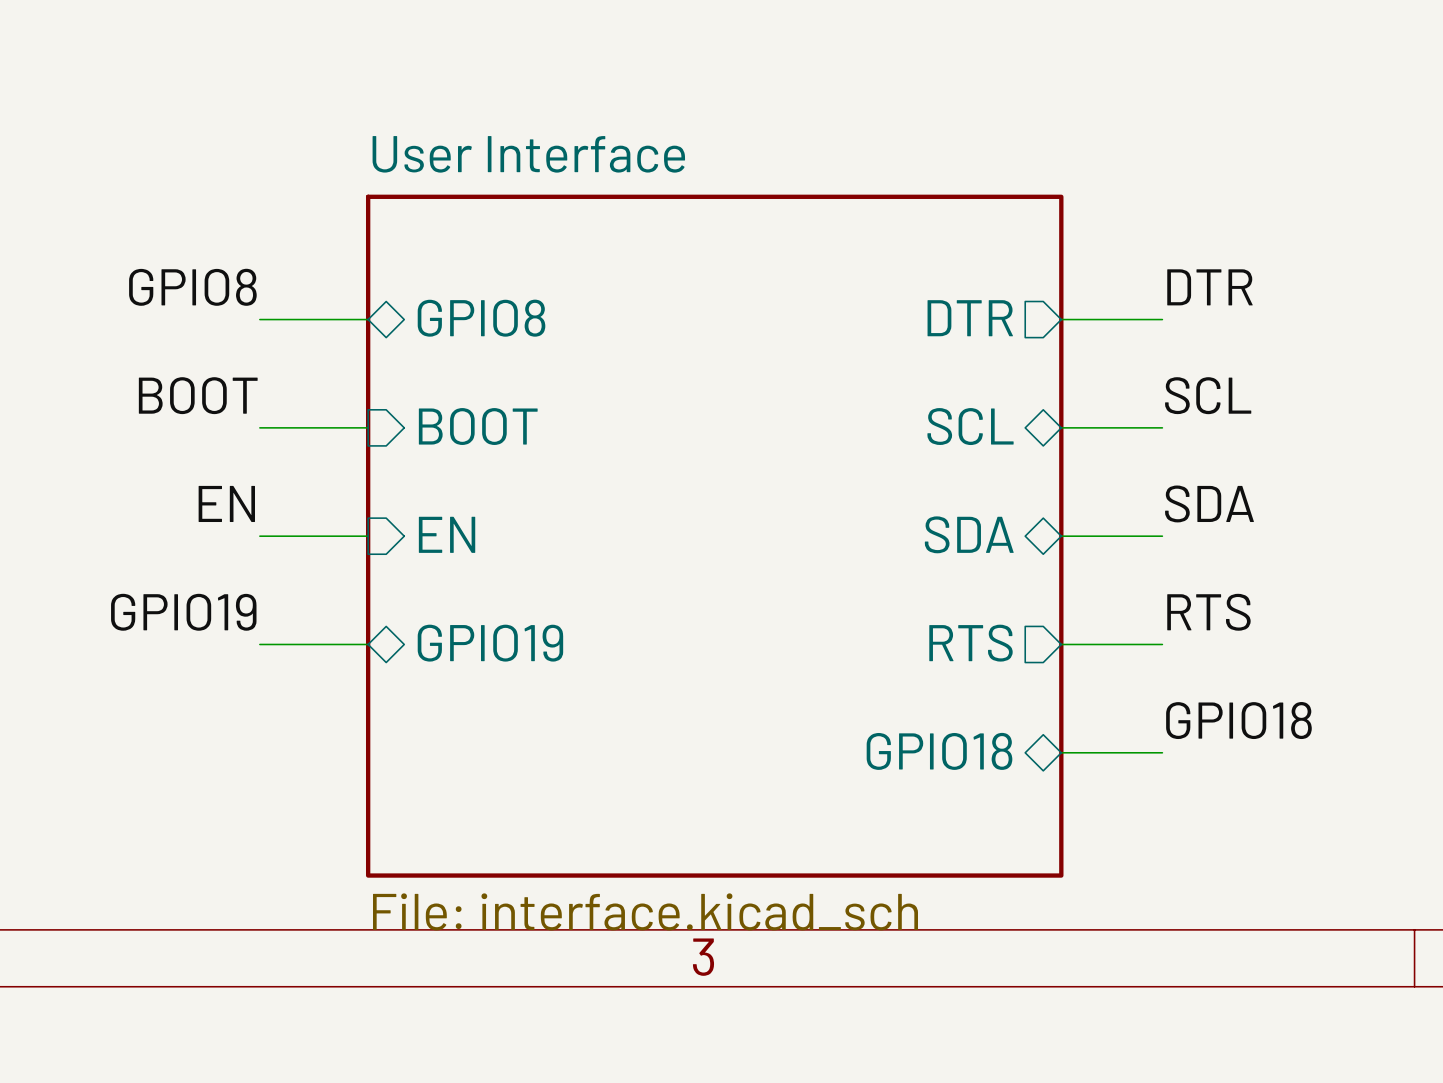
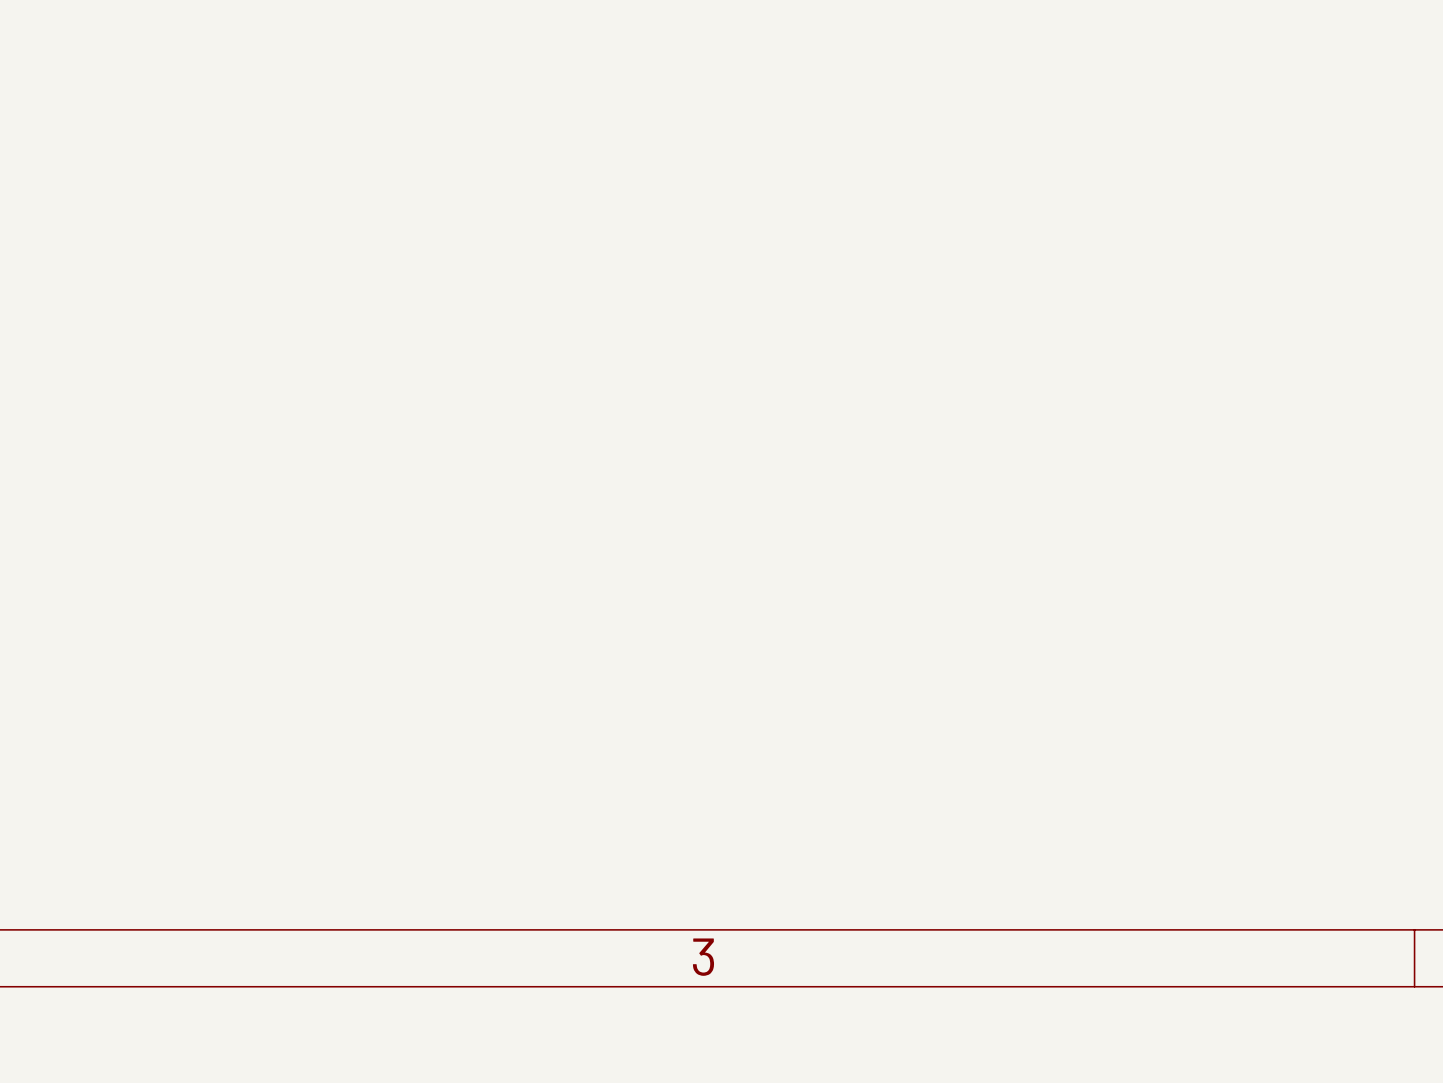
label: GPIO8 (192, 287) -> none
label: DTR (1209, 287) -> none
sheet pin: GPIO8 (481, 318) -> none
sheet pin: DTR (970, 318) -> none
wire: (259, 319) (368, 319) -> none
wire: (1061, 319) (1162, 319) -> none
label: BOOT (198, 395) -> none
label: SCL (1208, 395) -> none
sheet pin: BOOT (478, 426) -> none
sheet pin: SCL (970, 426) -> none
wire: (259, 427) (368, 427) -> none
wire: (1061, 427) (1162, 427) -> none
label: EN (226, 503) -> none
label: SDA (1209, 503) -> none
sheet pin: EN (447, 534) -> none
sheet pin: SDA (969, 534) -> none
wire: (259, 536) (368, 536) -> none
sheet User Interface: File: interface.kicad_sch (714, 536) -> none
wire: (1061, 536) (1162, 536) -> none
label: GPIO19 (183, 612) -> none
label: RTS (1208, 612) -> none
sheet pin: GPIO19 (490, 643) -> none
sheet pin: RTS (970, 643) -> none
wire: (259, 644) (368, 644) -> none
wire: (1061, 644) (1162, 644) -> none
label: GPIO18 (1238, 720) -> none
sheet pin: GPIO18 (939, 751) -> none
wire: (1061, 752) (1162, 752) -> none

